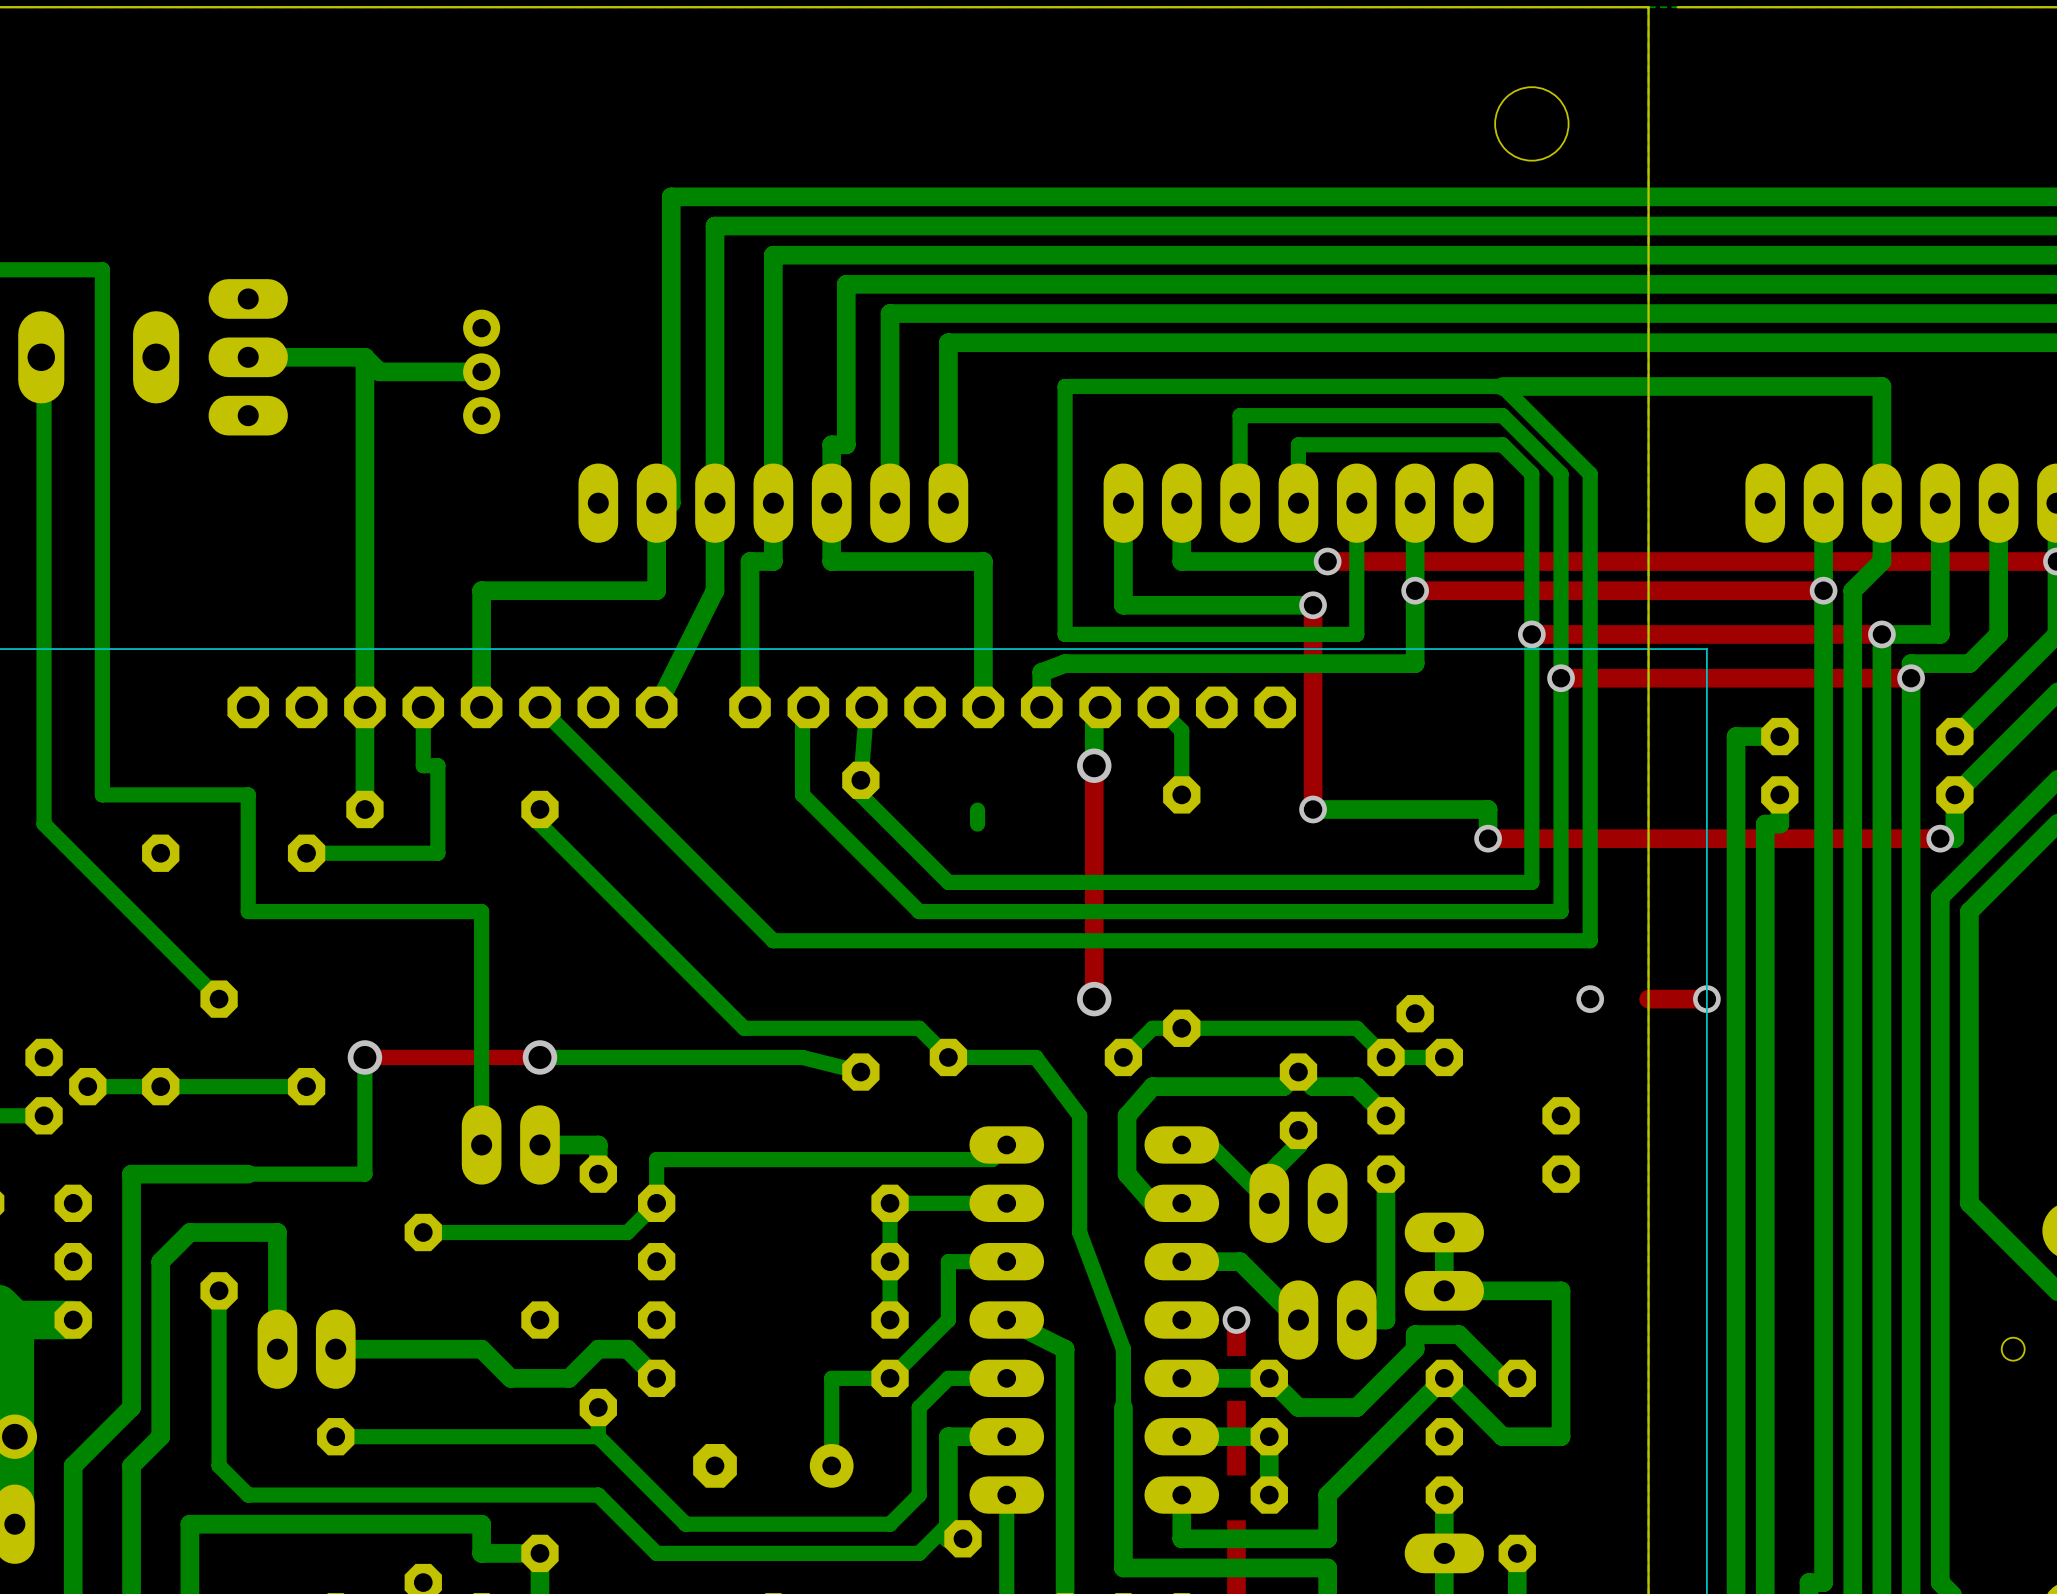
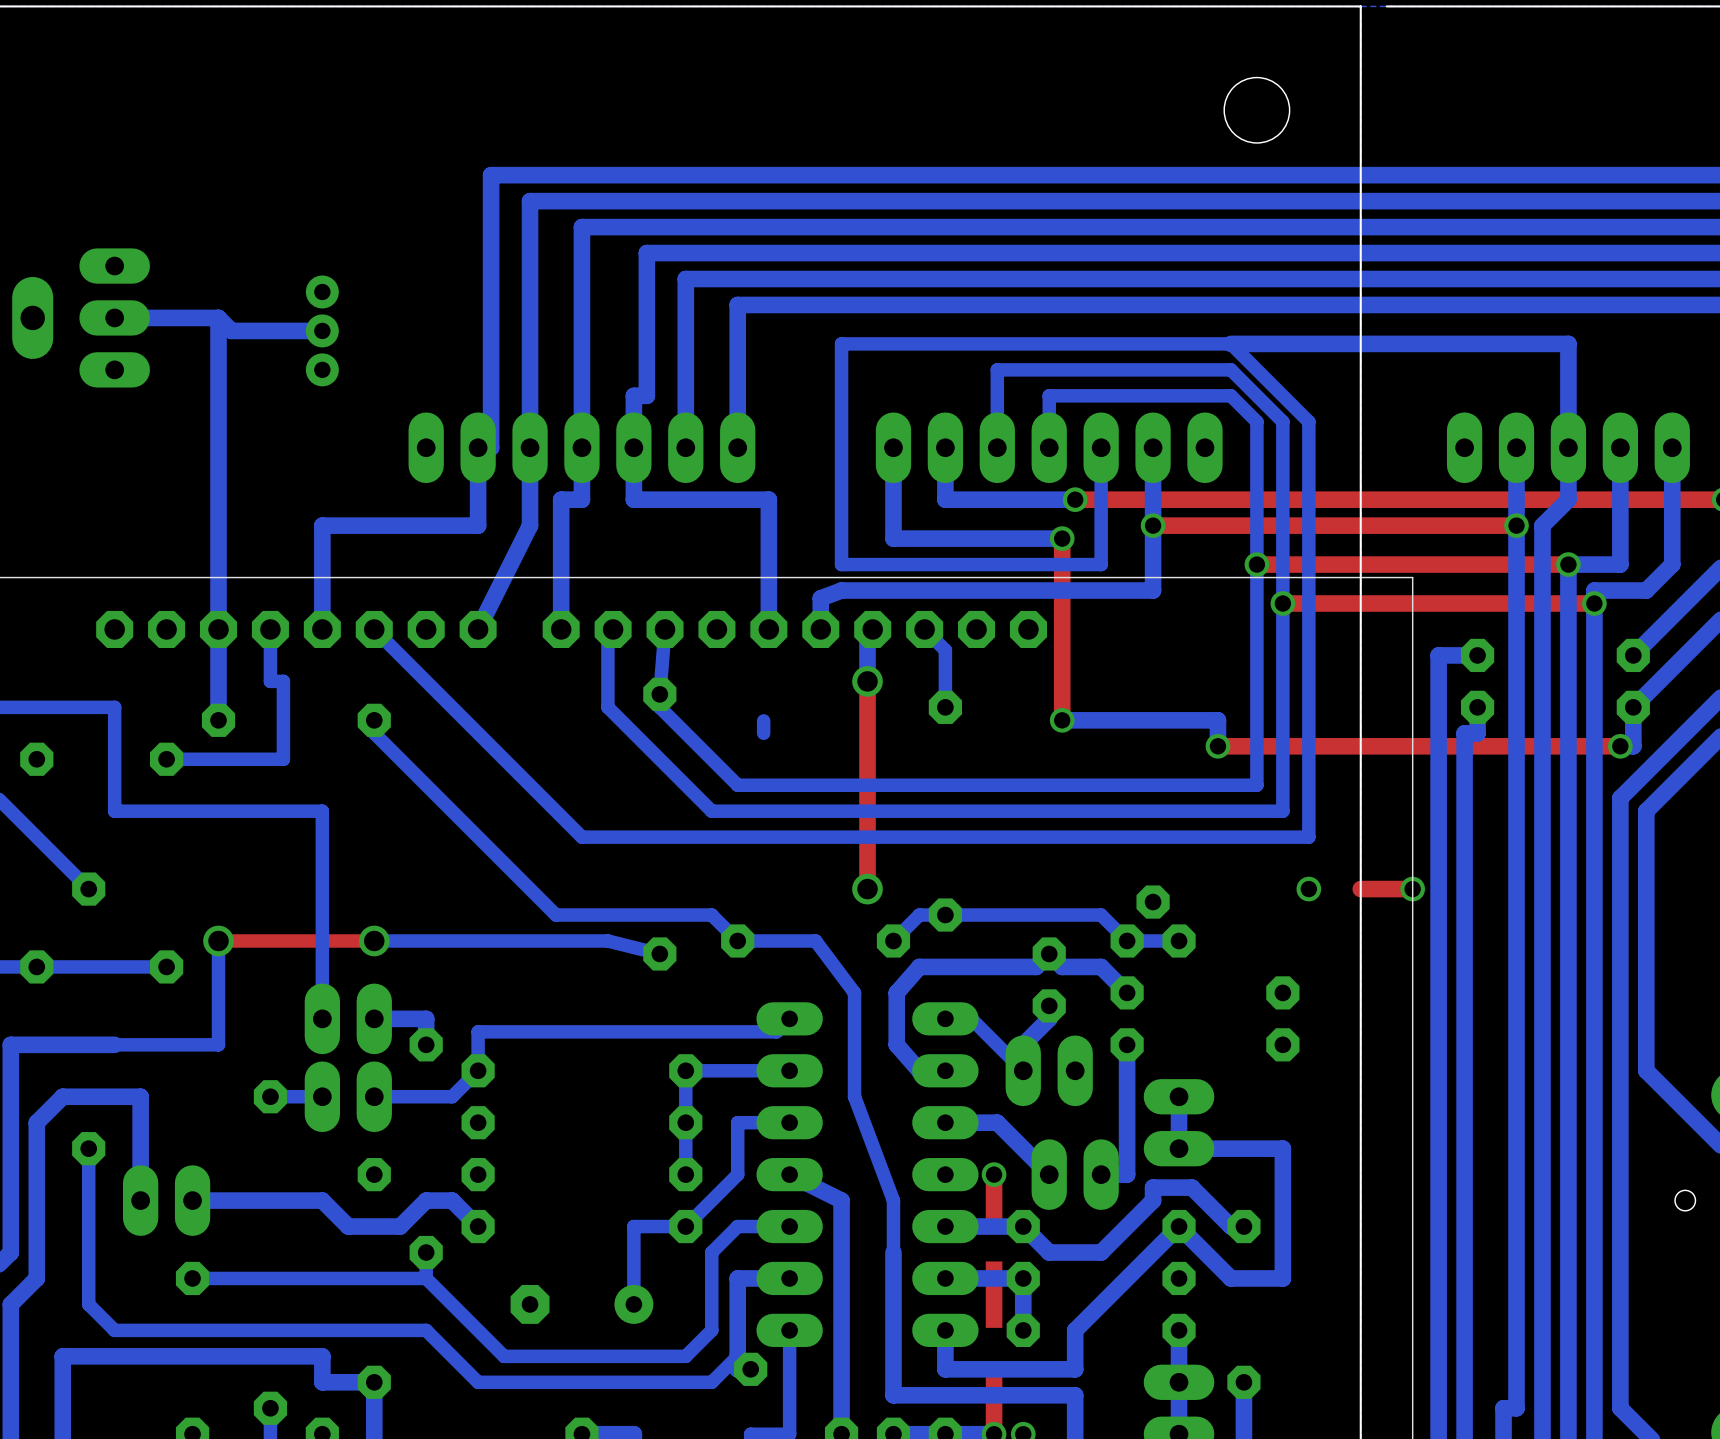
part: none -> (348, 1096)
bottom track: (539, 1232) (481, 1232) -> none

